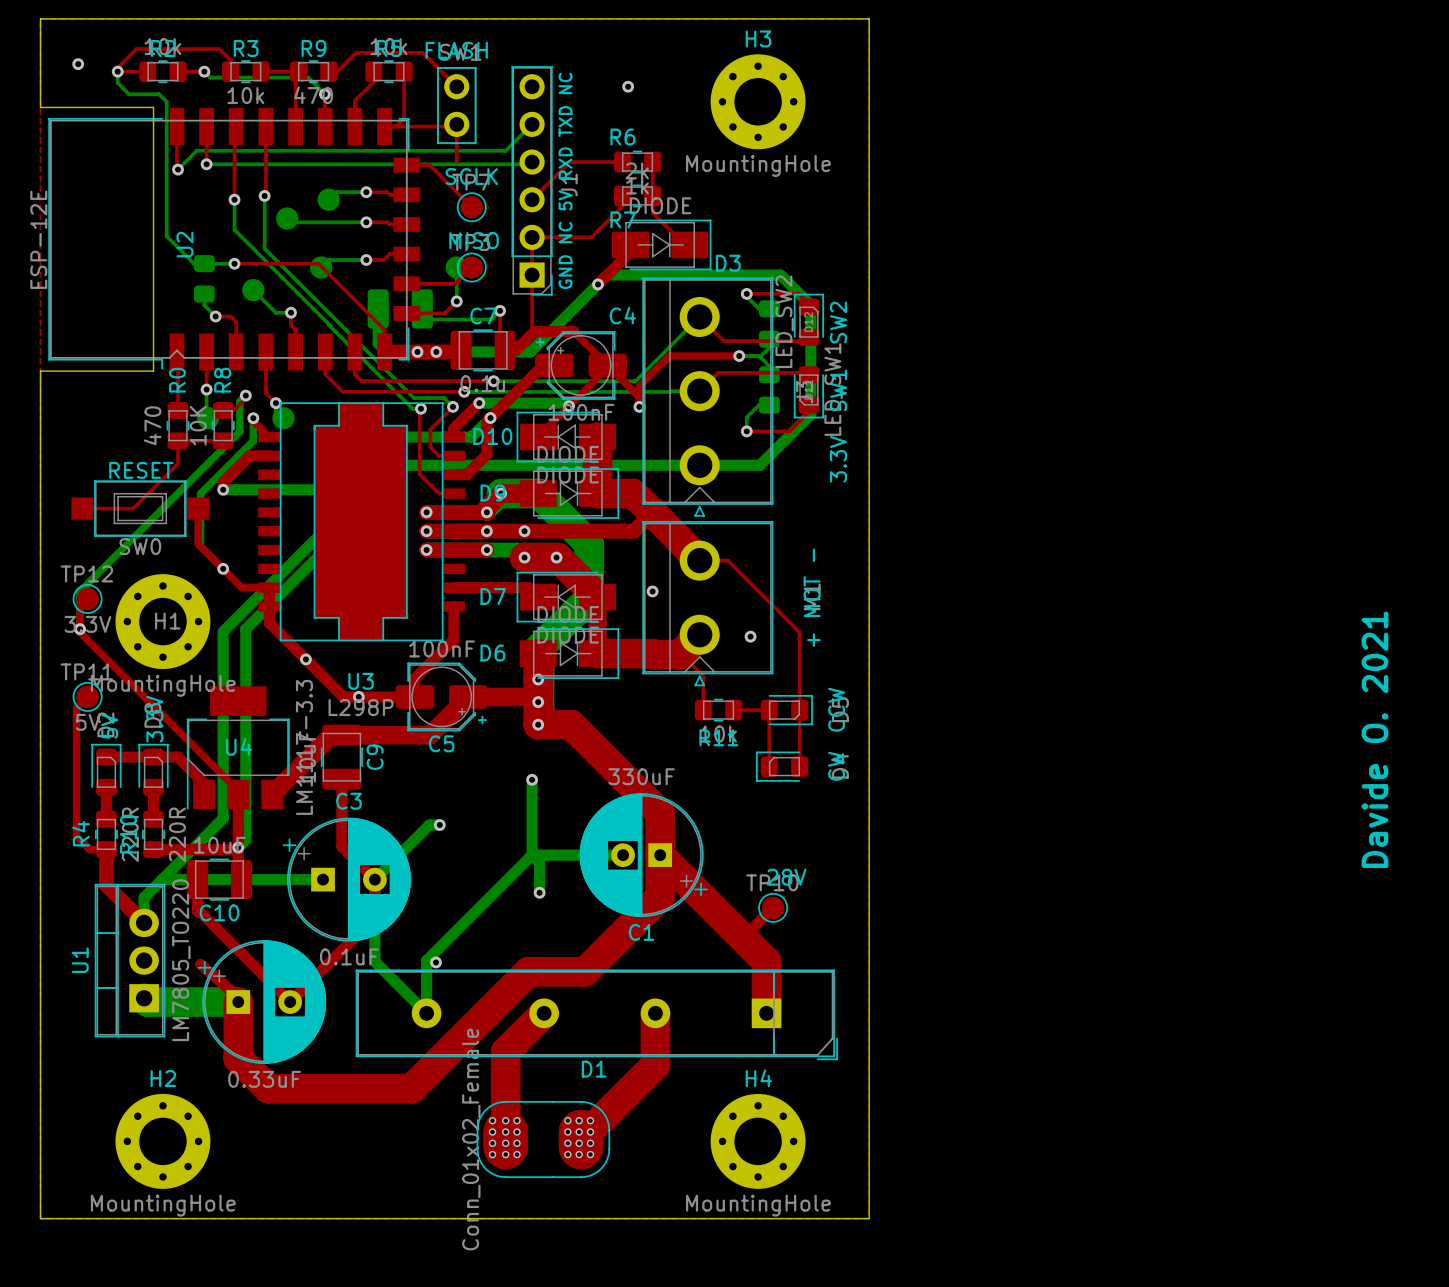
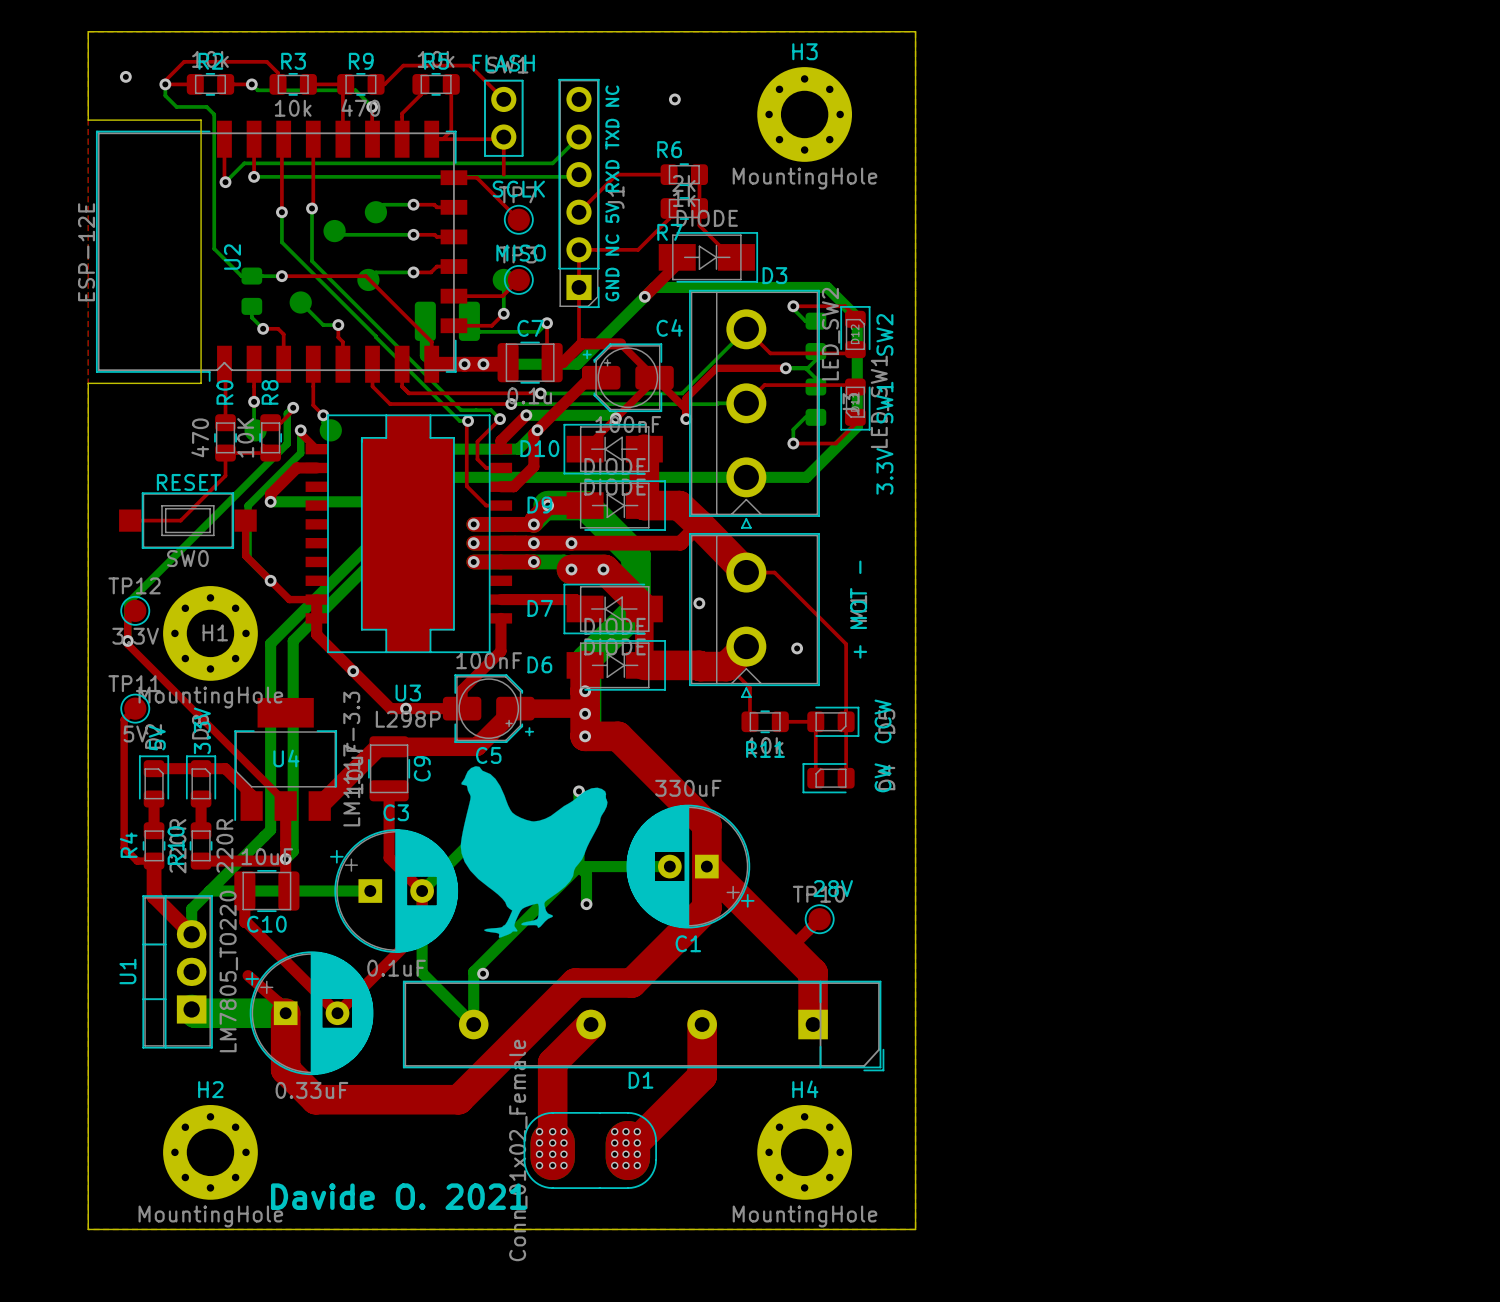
text: Davide O. 2021 (1374, 739) -> none
drawing: none -> [460, 766, 608, 938]
text: none -> Davide O. 2021 (399, 1196)

